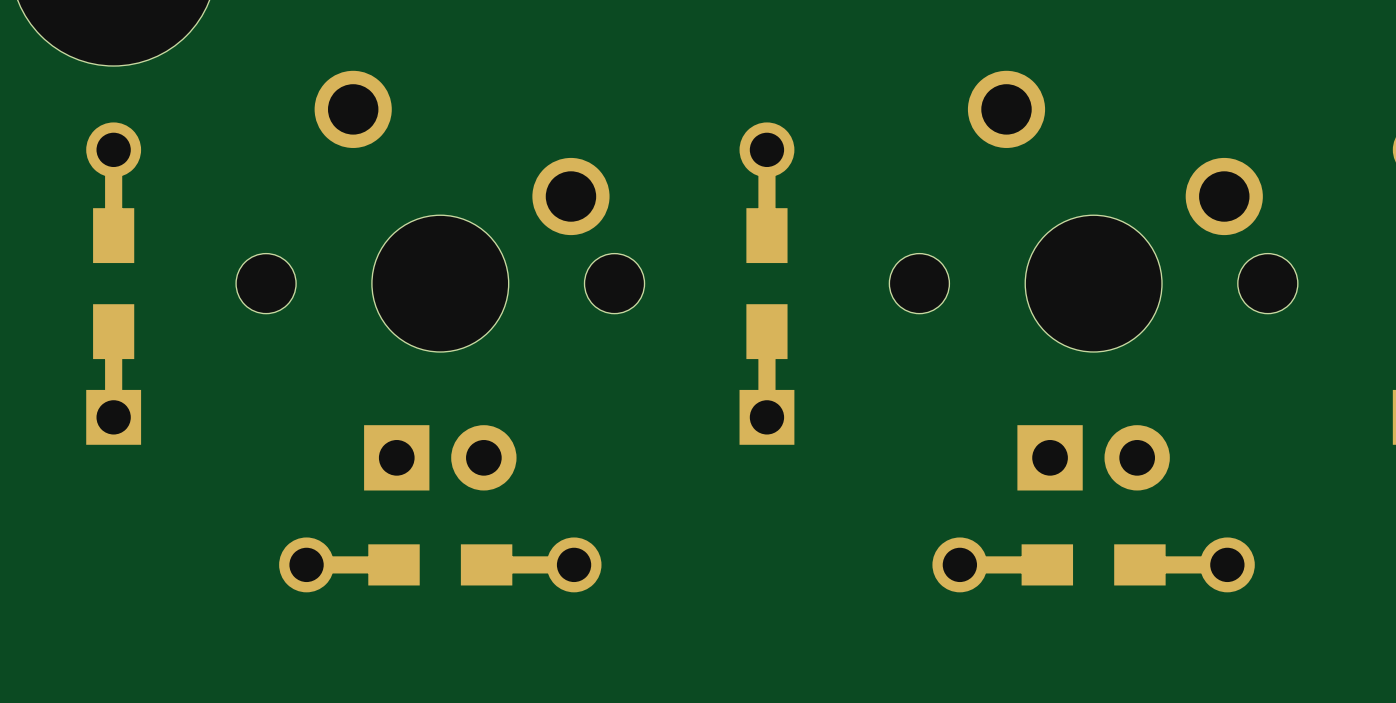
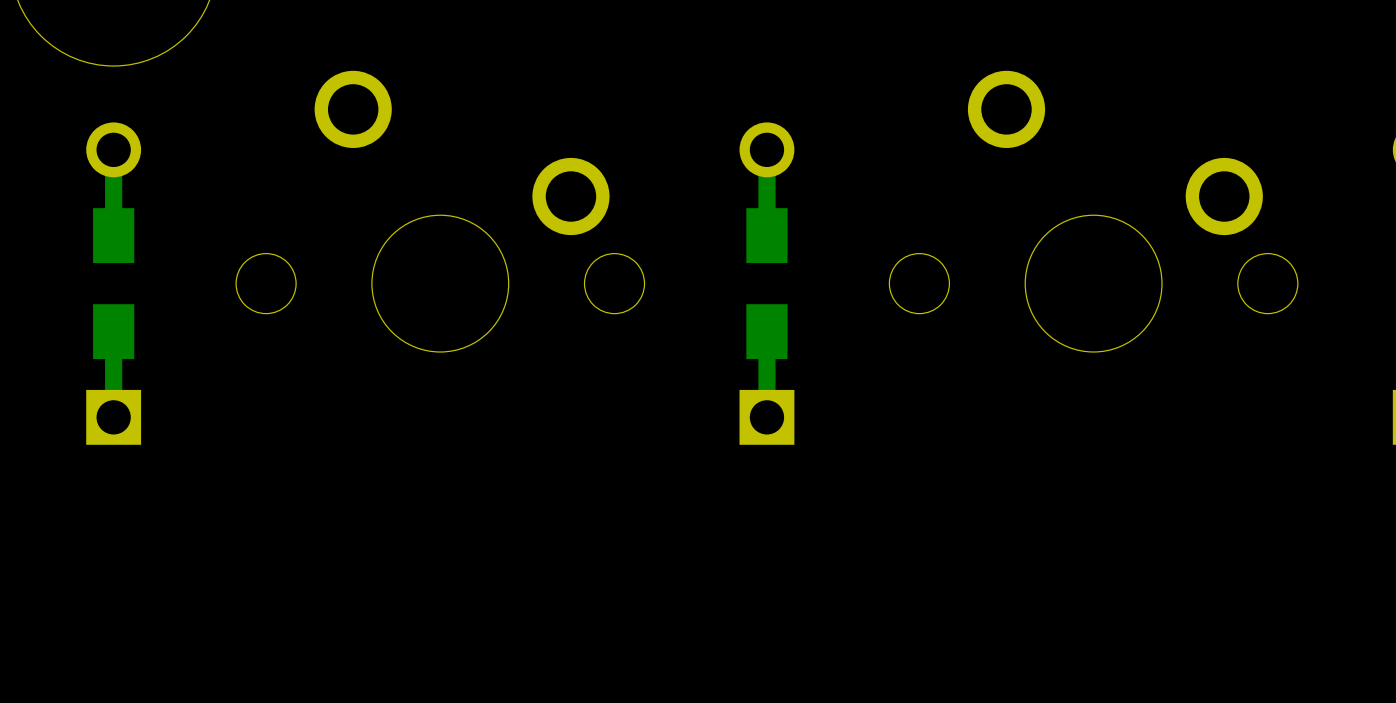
part: (440, 280) -> none
part: (1093, 280) -> none
part: (440, 564) -> none
part: (1093, 564) -> none

